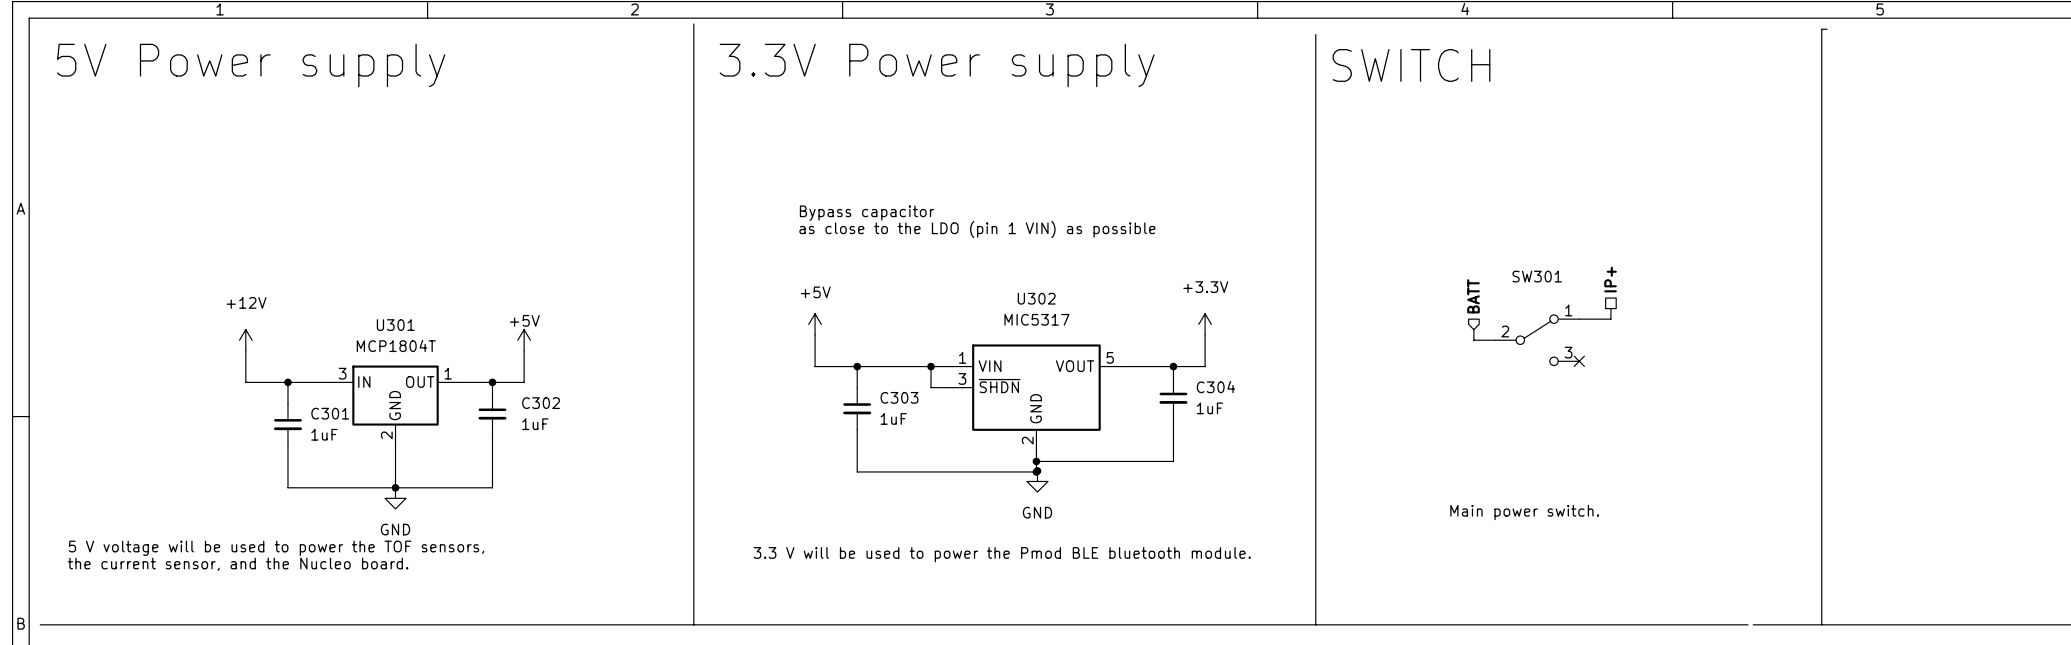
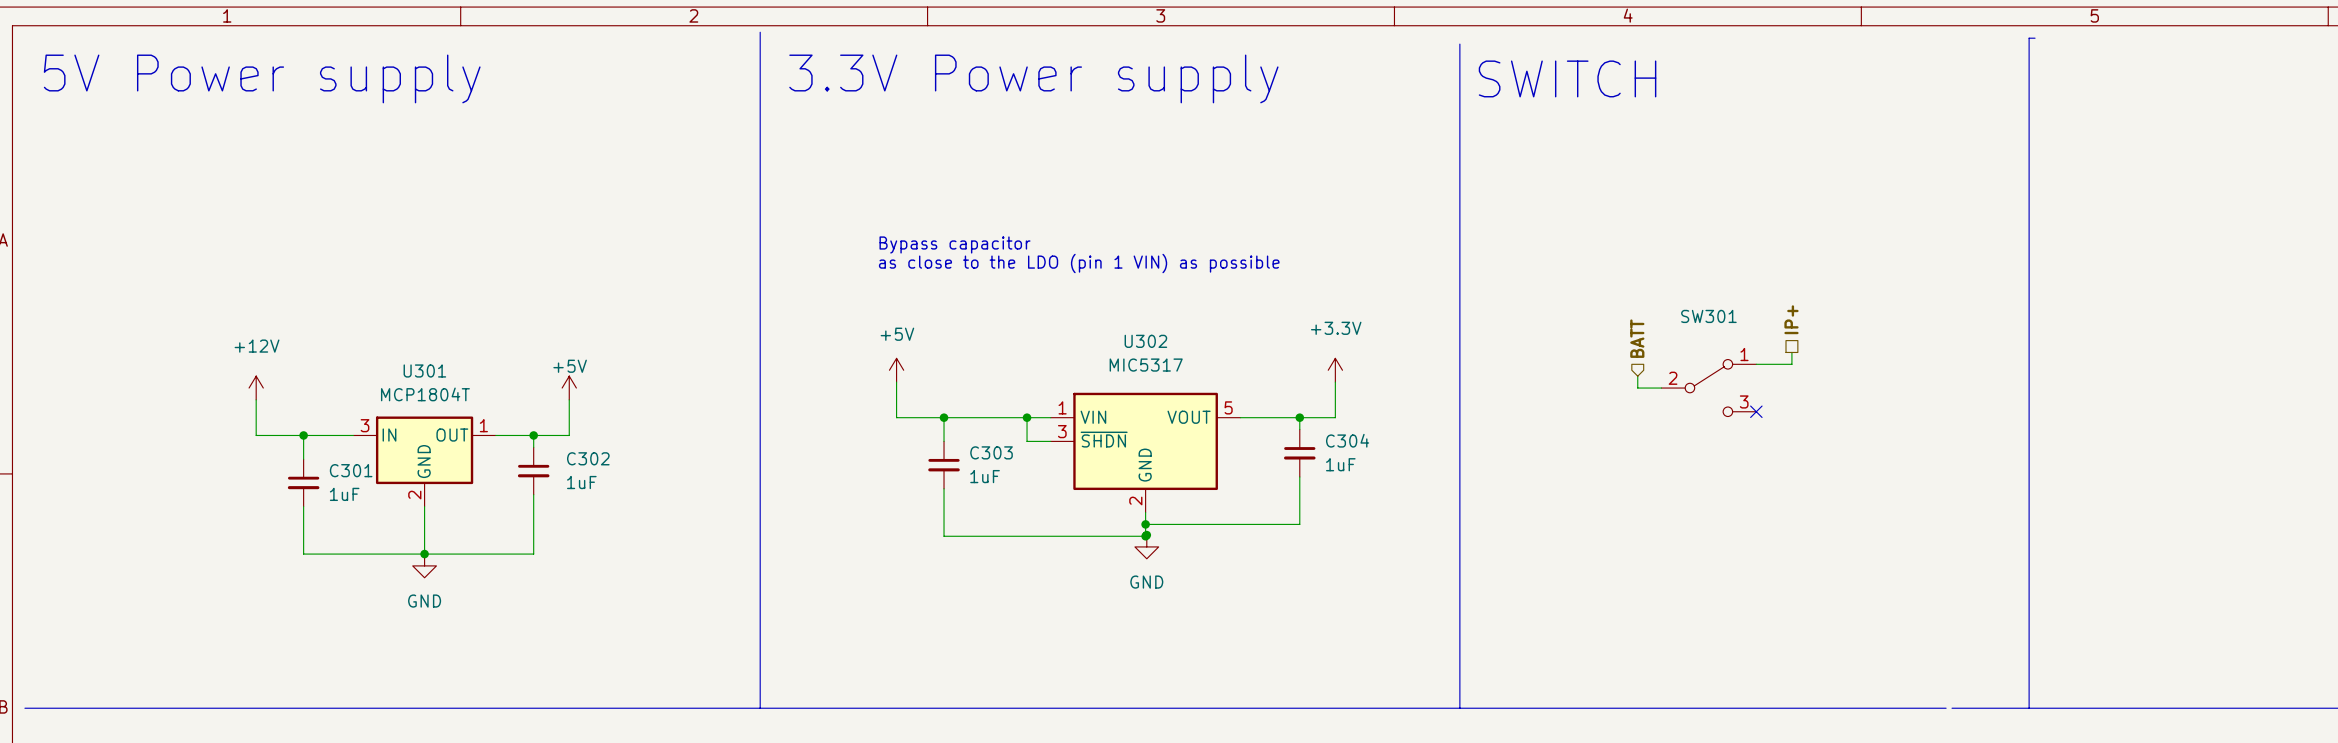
text: Main power switch. (1524, 512) -> none
text: 5 V voltage will be used to power the TOF sensors, (276, 548) -> none
text: 3.3 V will be used to power the Pmod BLE bluetooth module. (1002, 554) -> none
text: the current sensor, and the Nucleo board. (238, 564) -> none

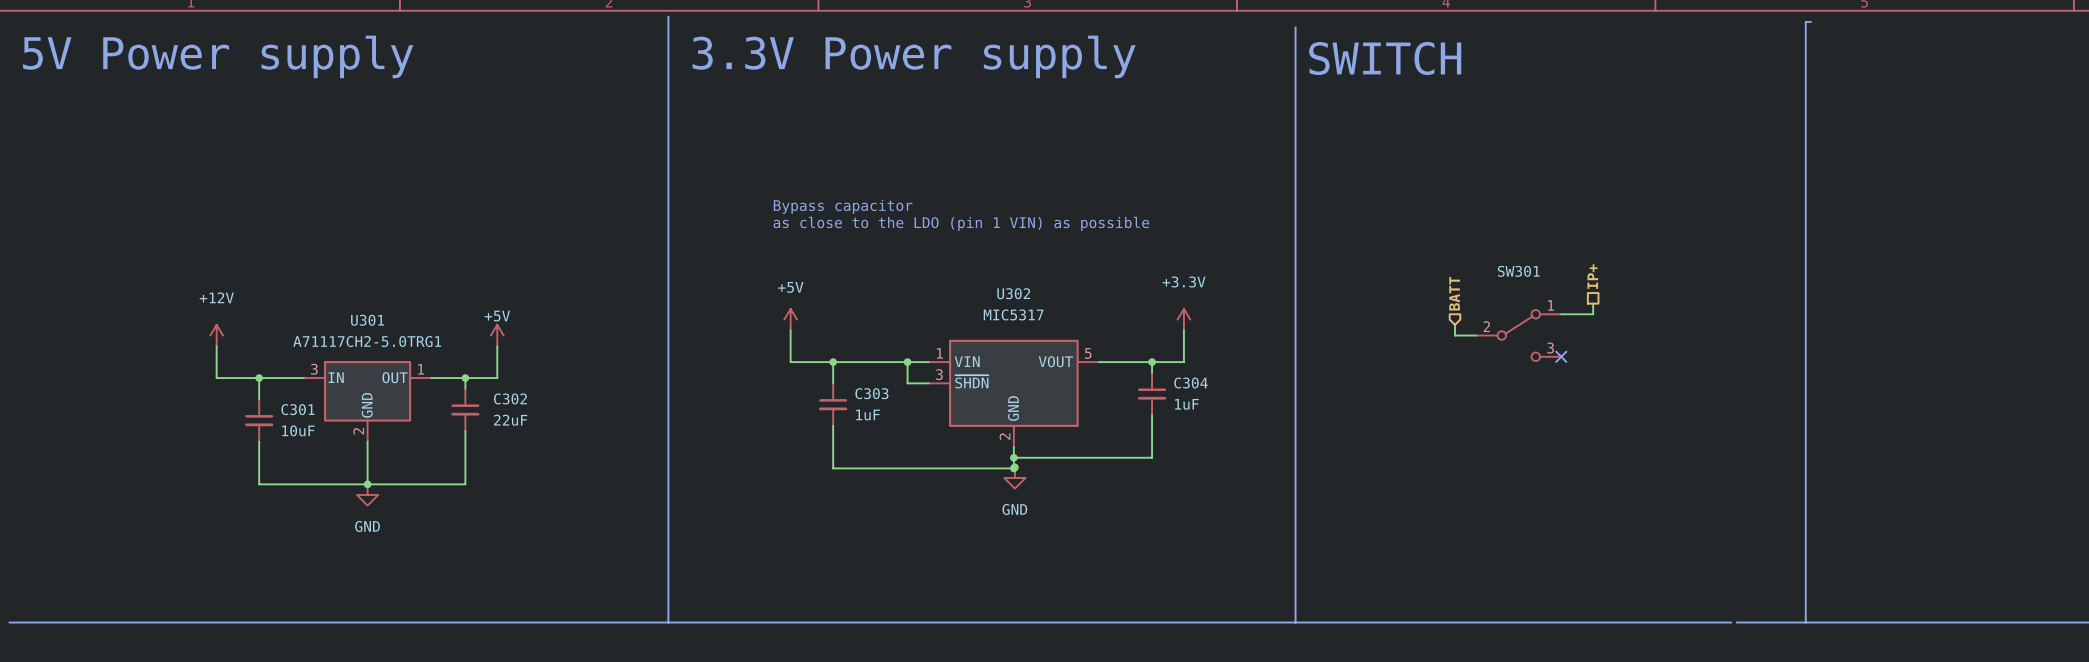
U301 value: MCP1804T (425, 394) -> A71117CH2-5.0TRG1 (367, 341)
C302 value: 1uF (581, 482) -> 22uF (510, 420)
C301 value: 1uF (344, 494) -> 10uF (298, 430)

